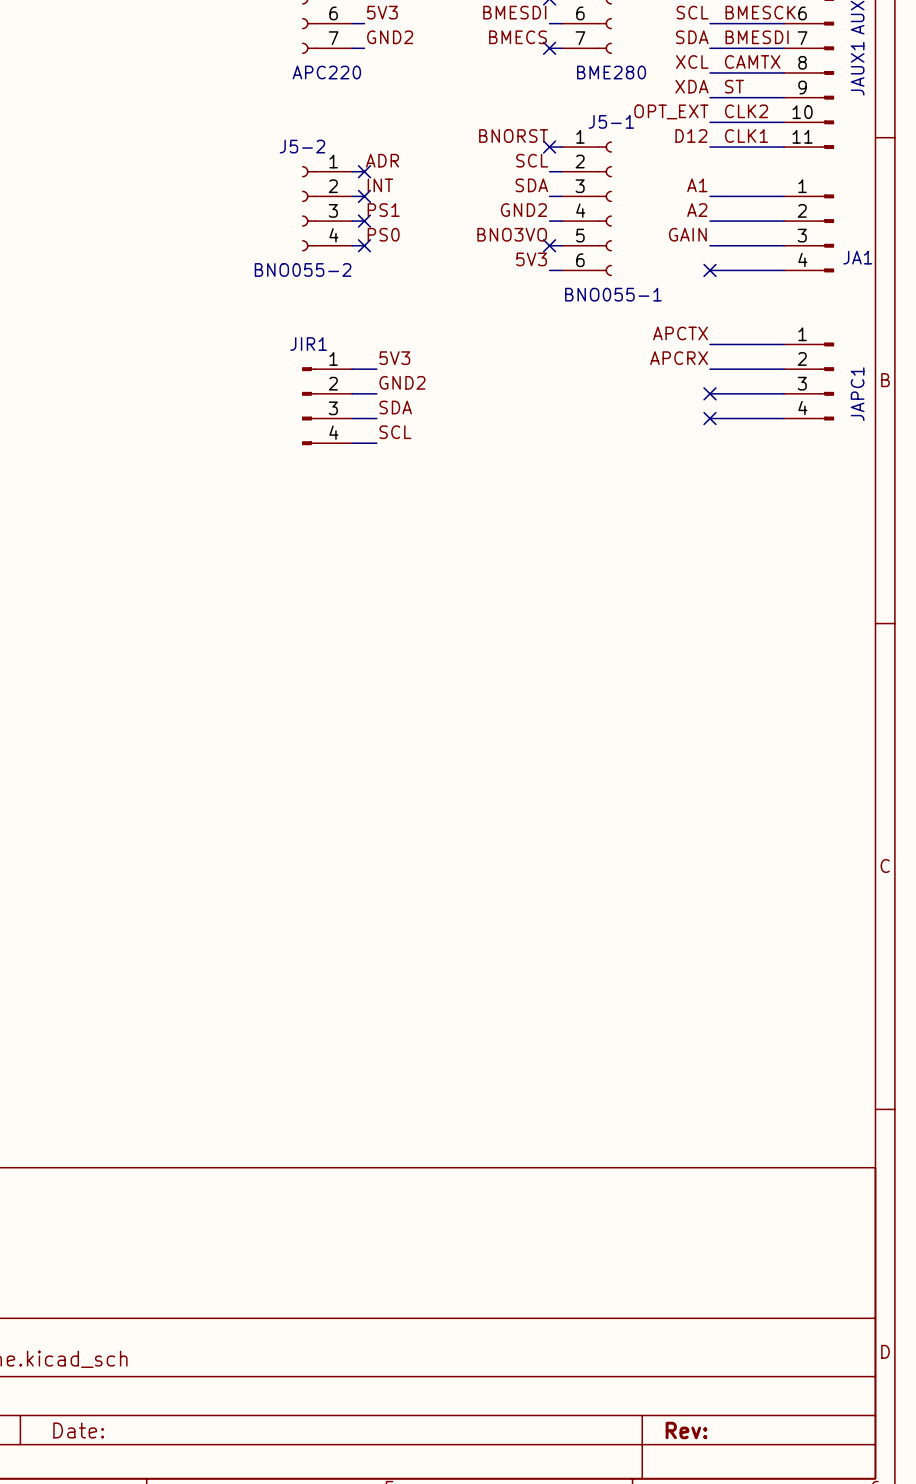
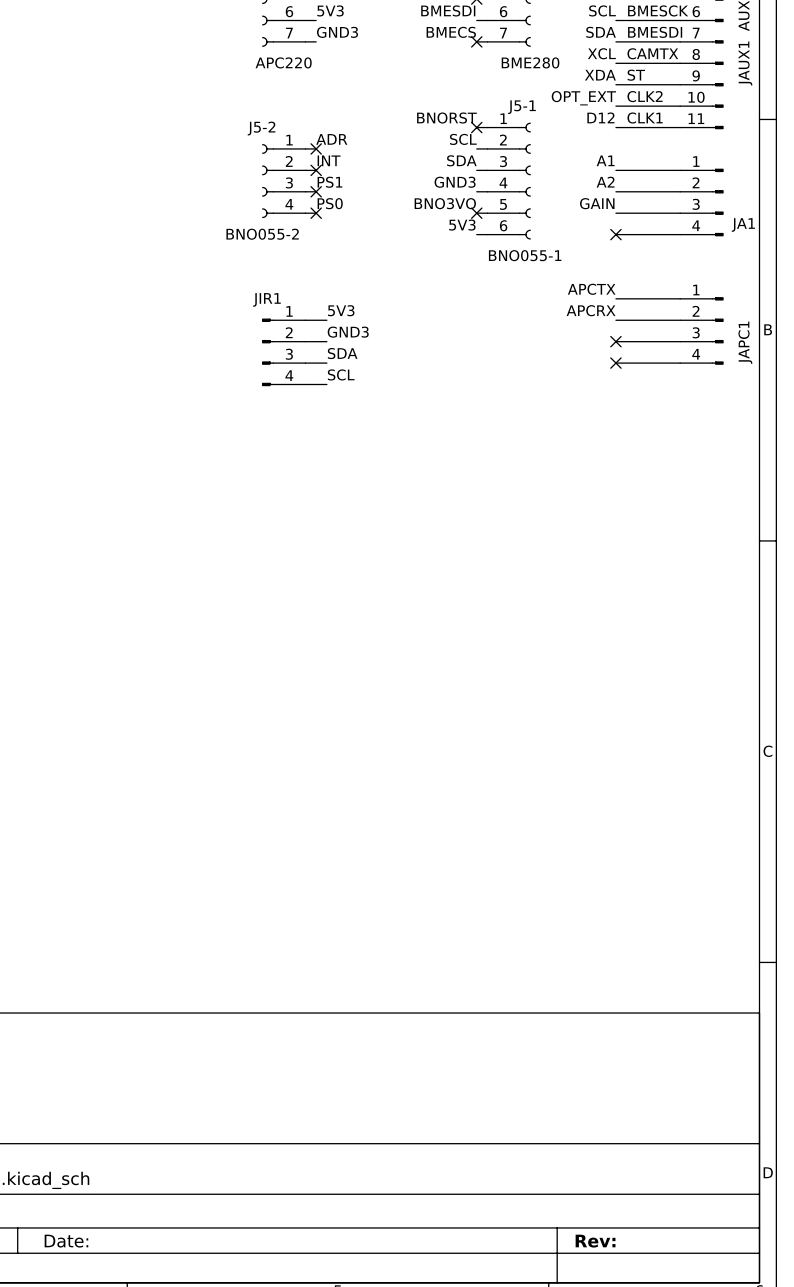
label: GND2 (390, 37) -> GND3 (337, 32)
label: GND2 (523, 210) -> GND3 (455, 182)
label: GND2 (402, 382) -> GND3 (348, 332)

